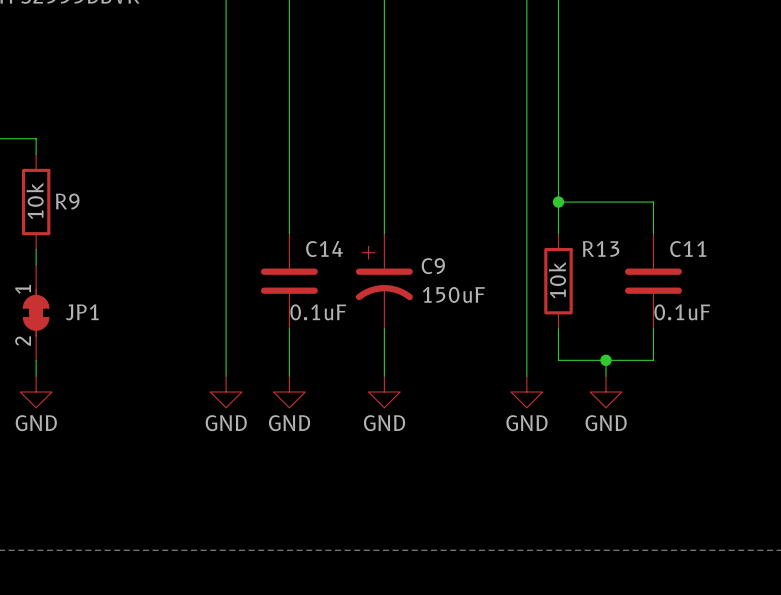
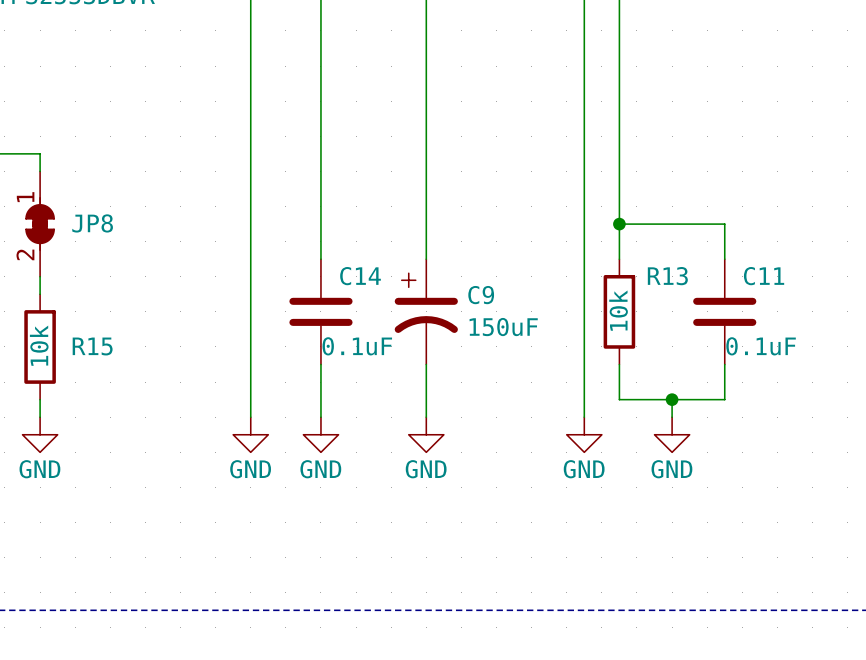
R9: 10k (36, 202) -> none
JP8: none -> (40, 224)
JP1: (36, 312) -> none
R15: none -> 10k (40, 346)

